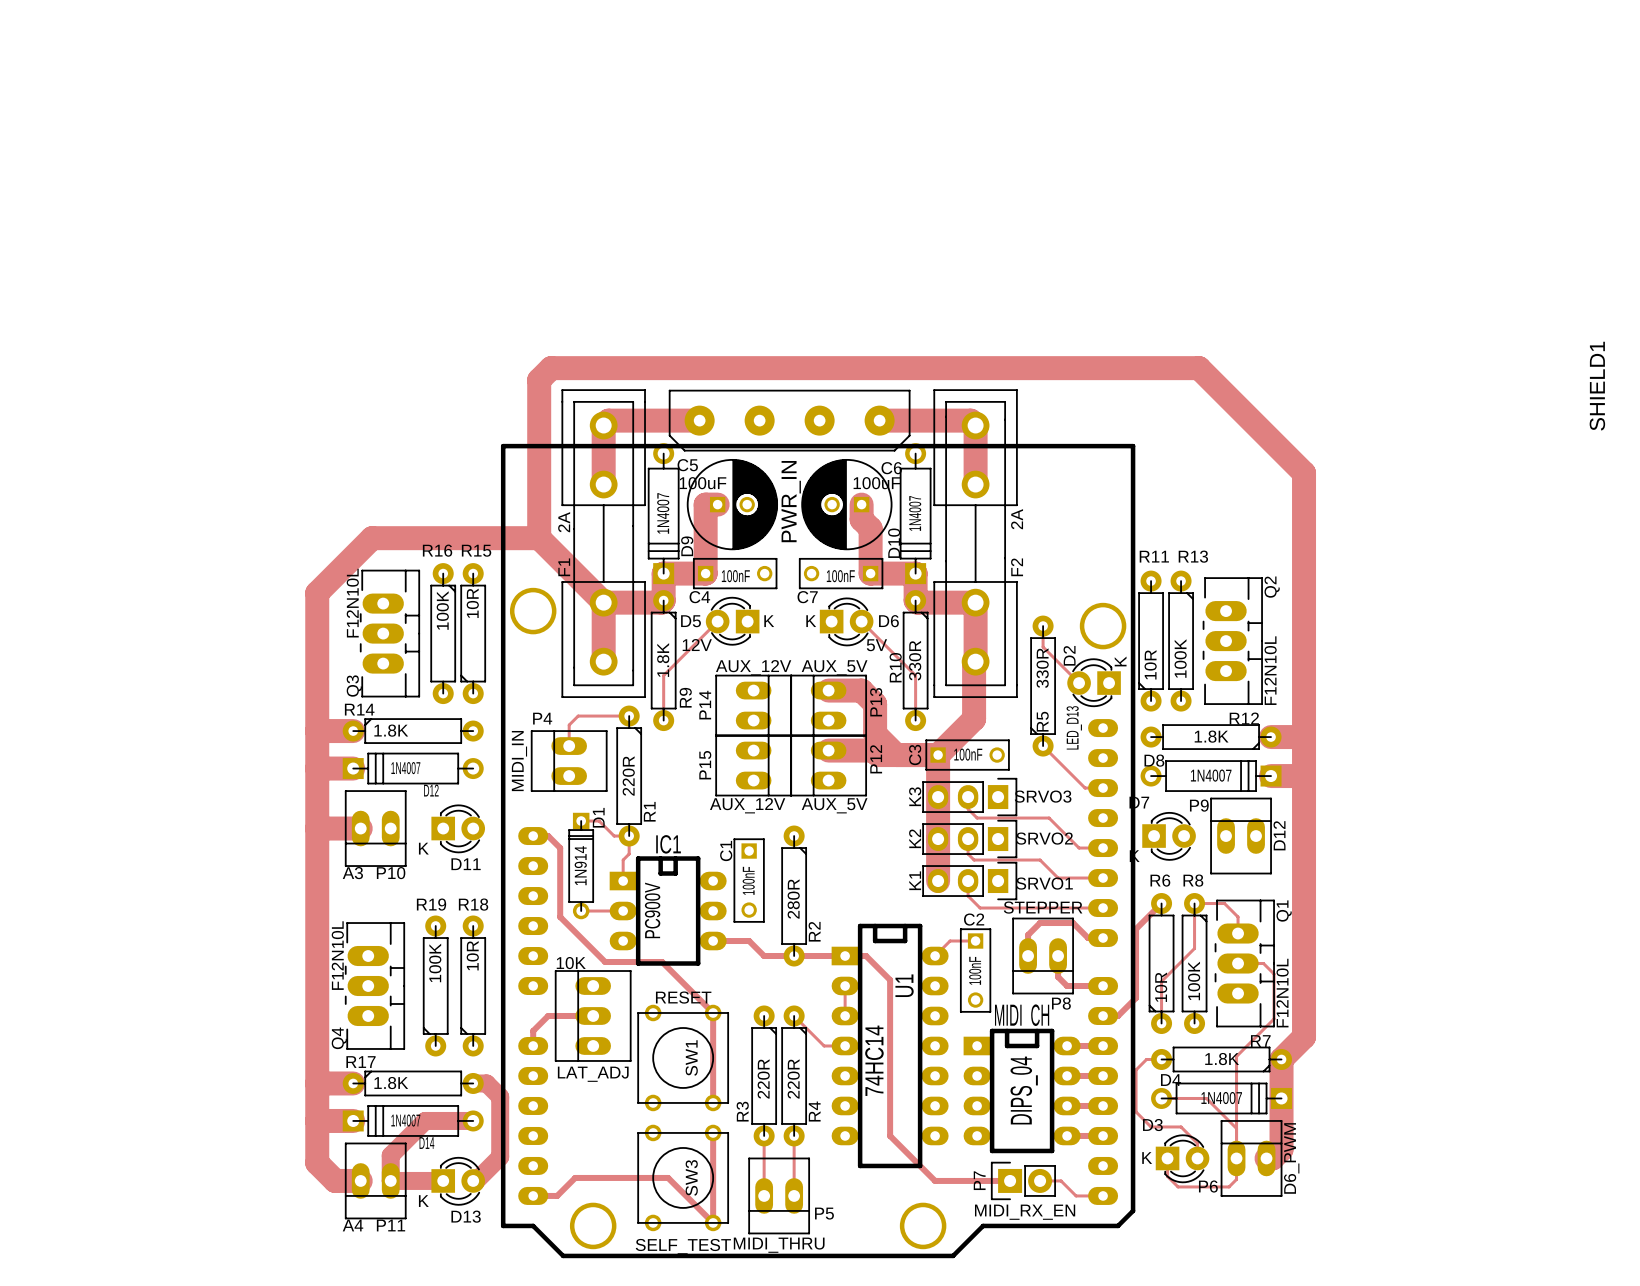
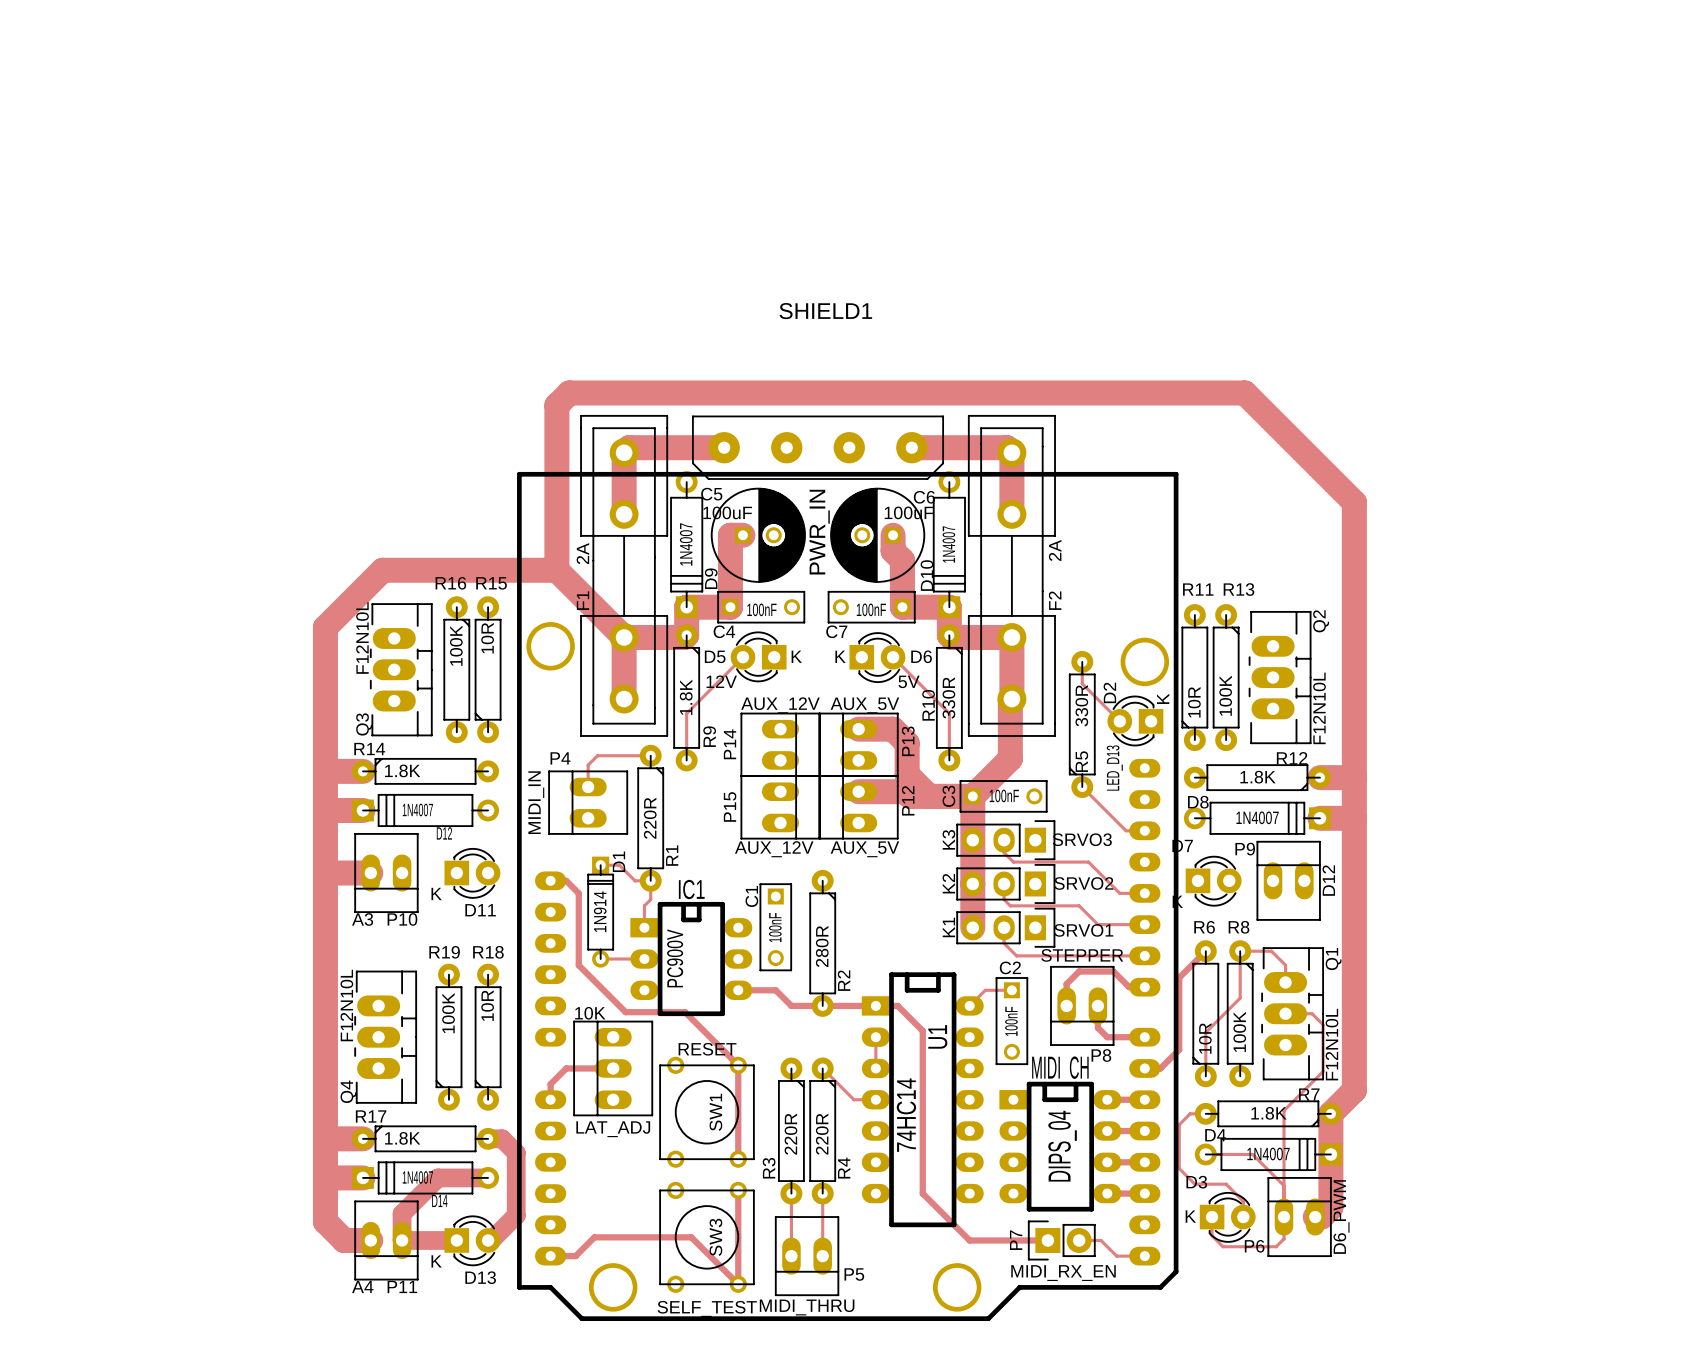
SHIELD1 name rotation: 0° (1597, 386) -> 90° clockwise (825, 311)
SHIELD1 name position: SHIELD1 (1597, 386) -> SHIELD1 (825, 311)

